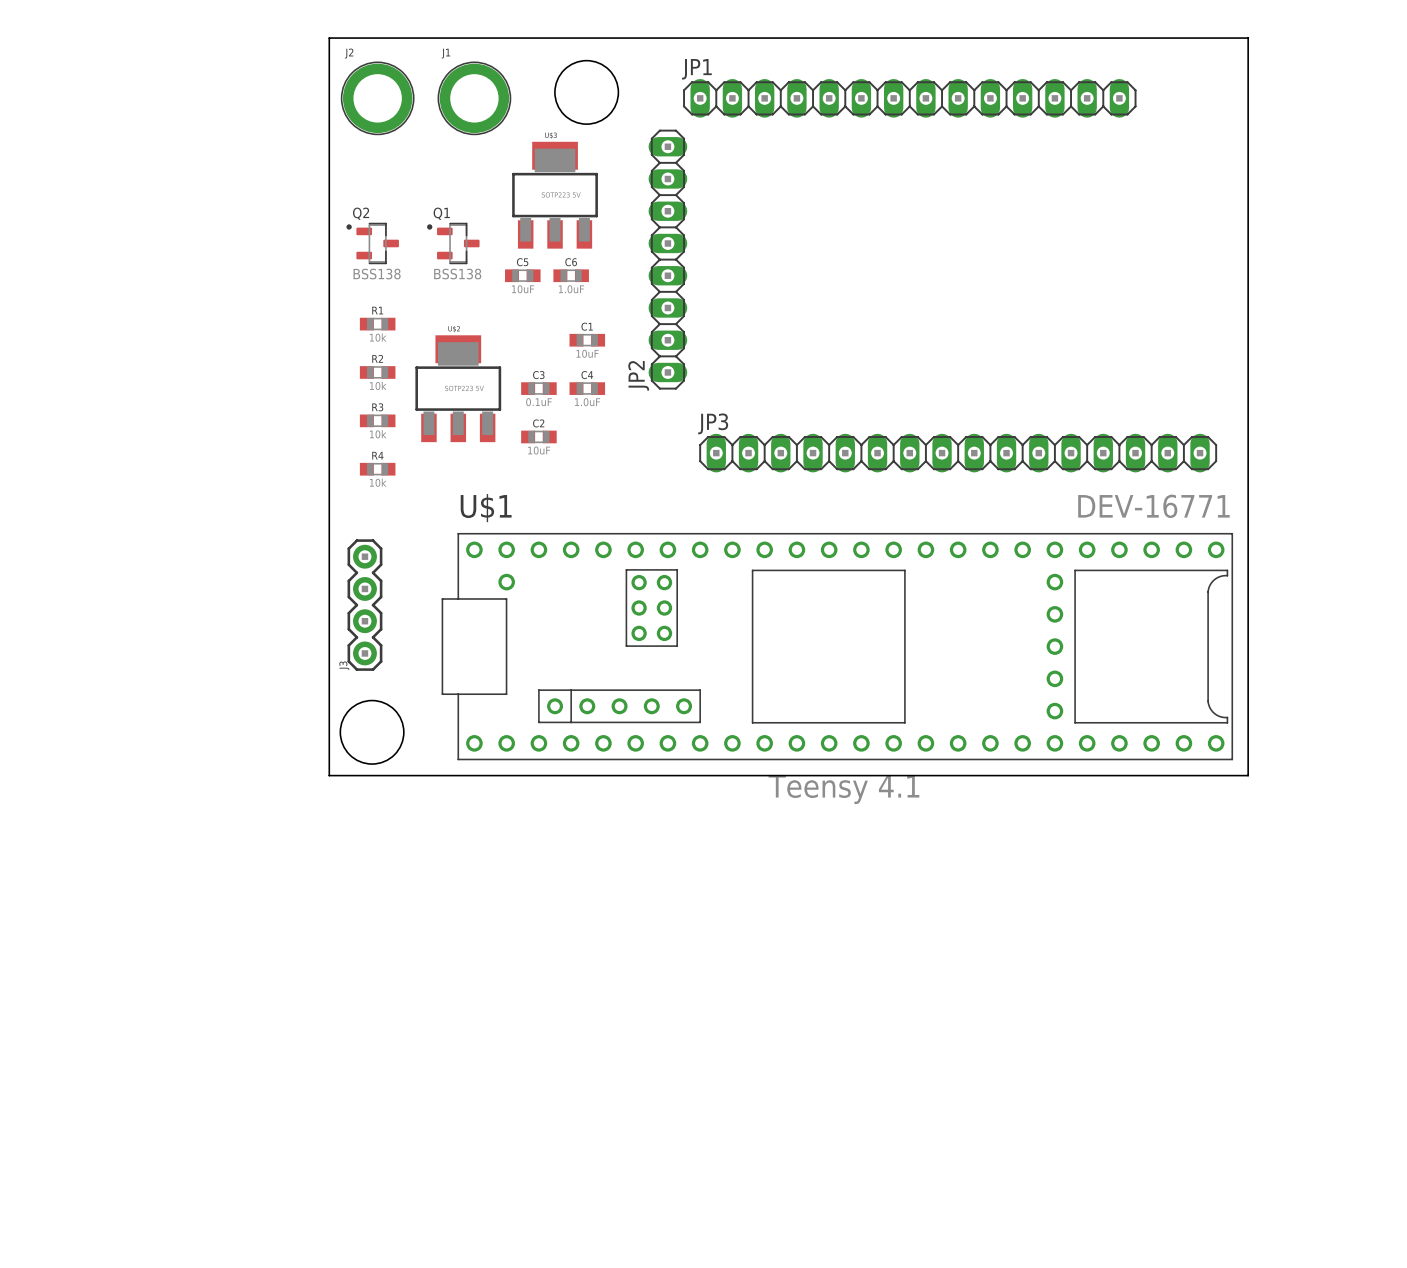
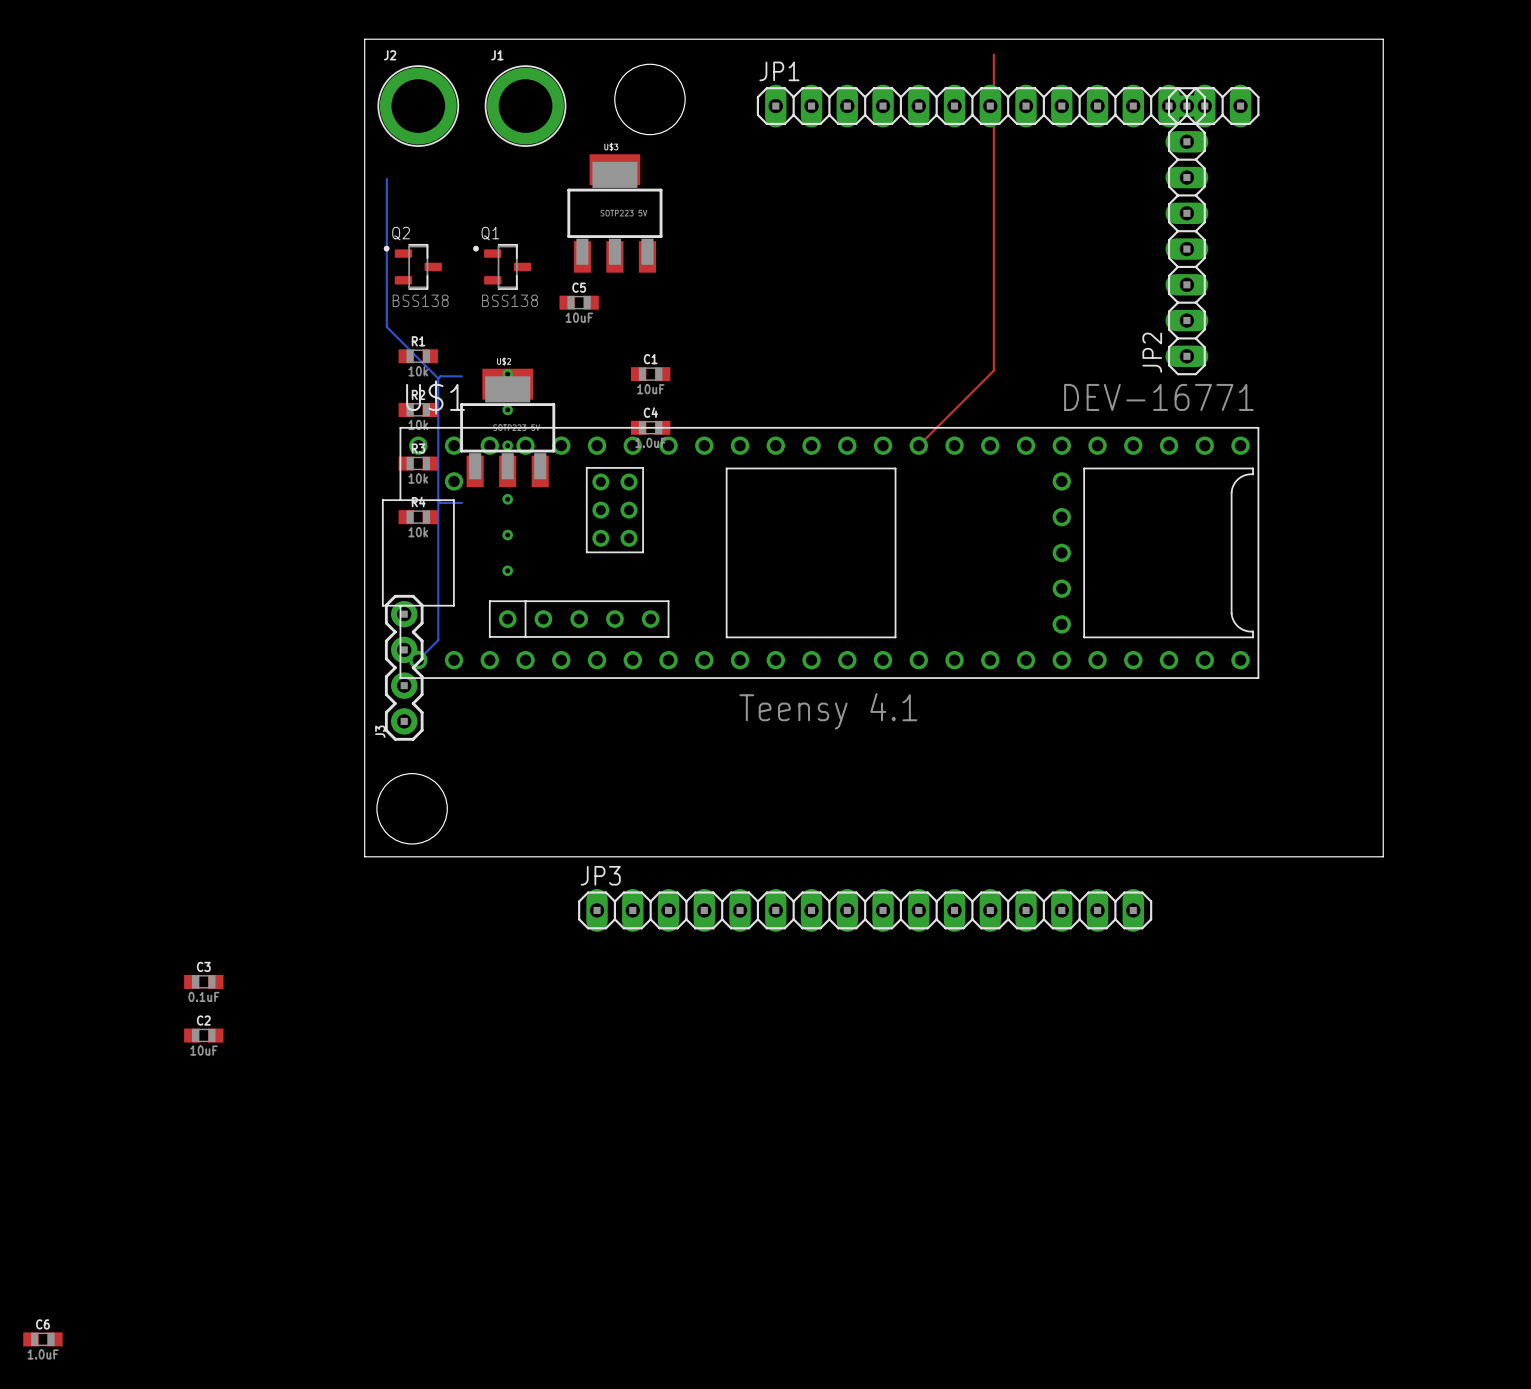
top track: none -> (993, 54) (993, 370) (918, 445)
bottom track: none -> (386, 178) (386, 327) (438, 378)
JP2 position: (667, 259) -> (1186, 231)
C6 position: (571, 275) -> (42, 1339)
via: none -> (507, 374)
bottom track: none -> (461, 376) (440, 376) (438, 378)
bottom track: none -> (438, 378) (438, 640) (418, 660)
via: none -> (507, 409)
C3 position: (538, 388) -> (203, 981)
via: none -> (507, 445)
C2 position: (538, 436) -> (203, 1035)
via: none -> (507, 499)
JP3 position: (958, 453) -> (865, 910)
bottom track: none -> (438, 500) (440, 502) (461, 502)
via: none -> (507, 535)
via: none -> (507, 570)
U$1 position: (837, 646) -> (820, 552)

